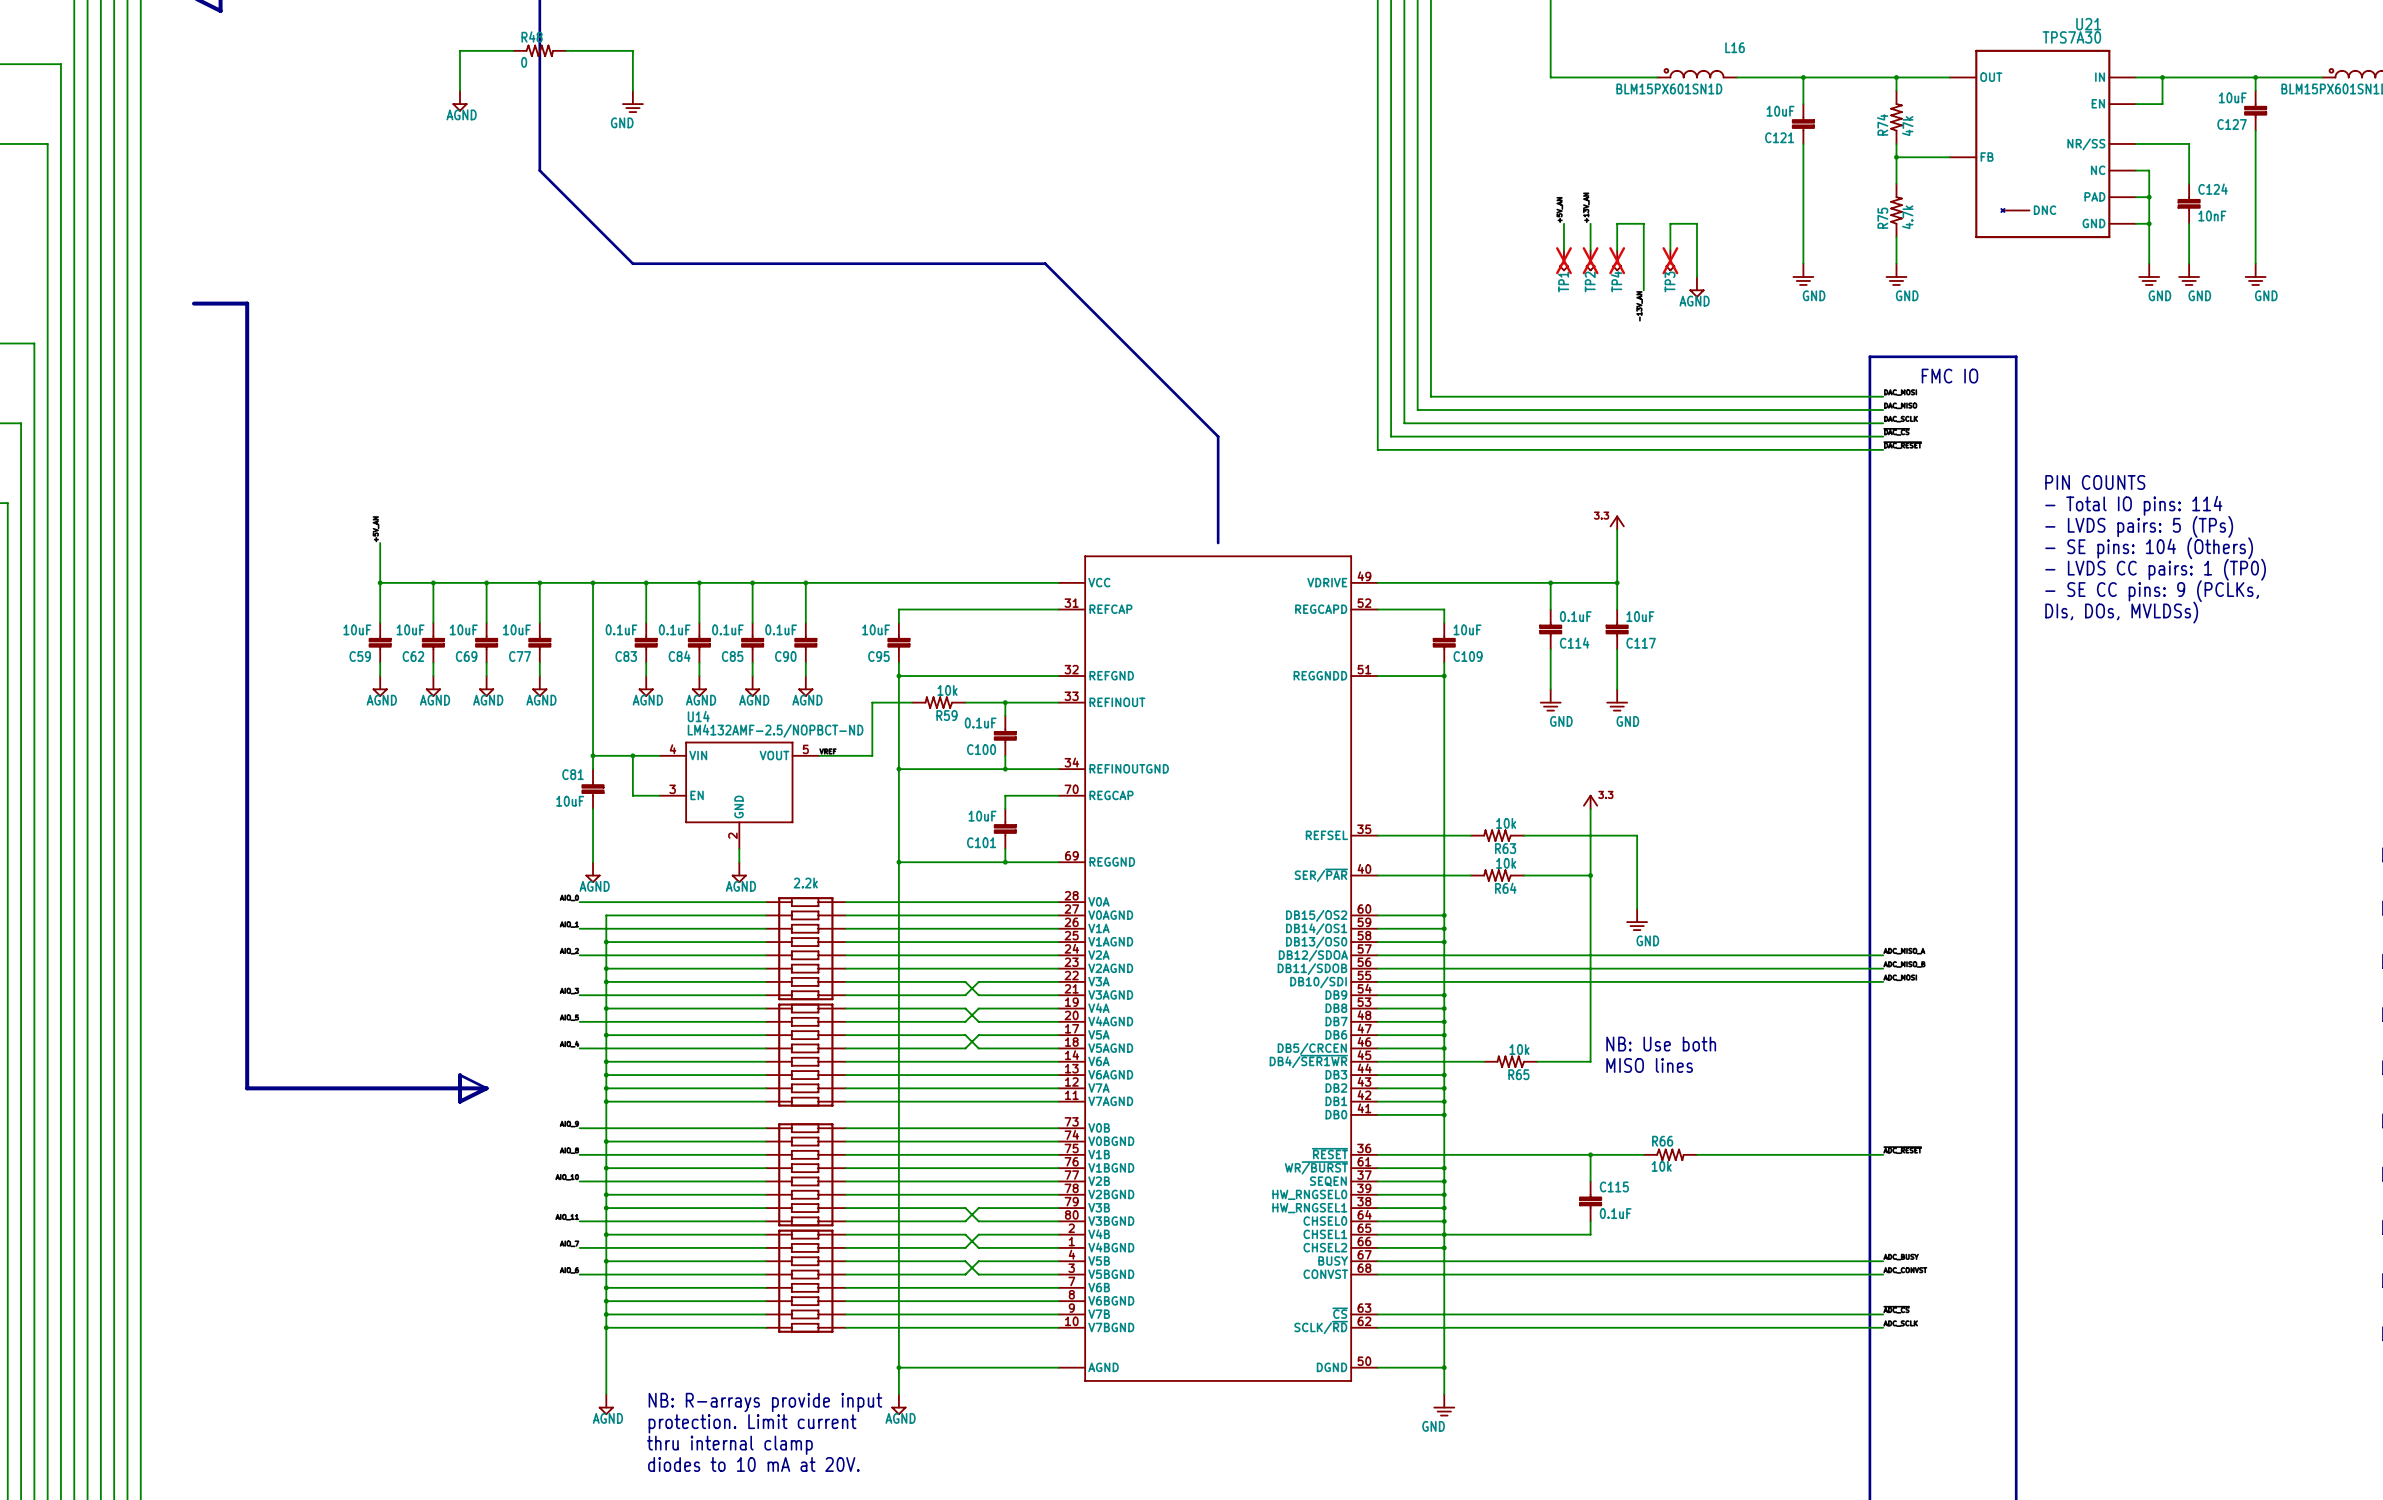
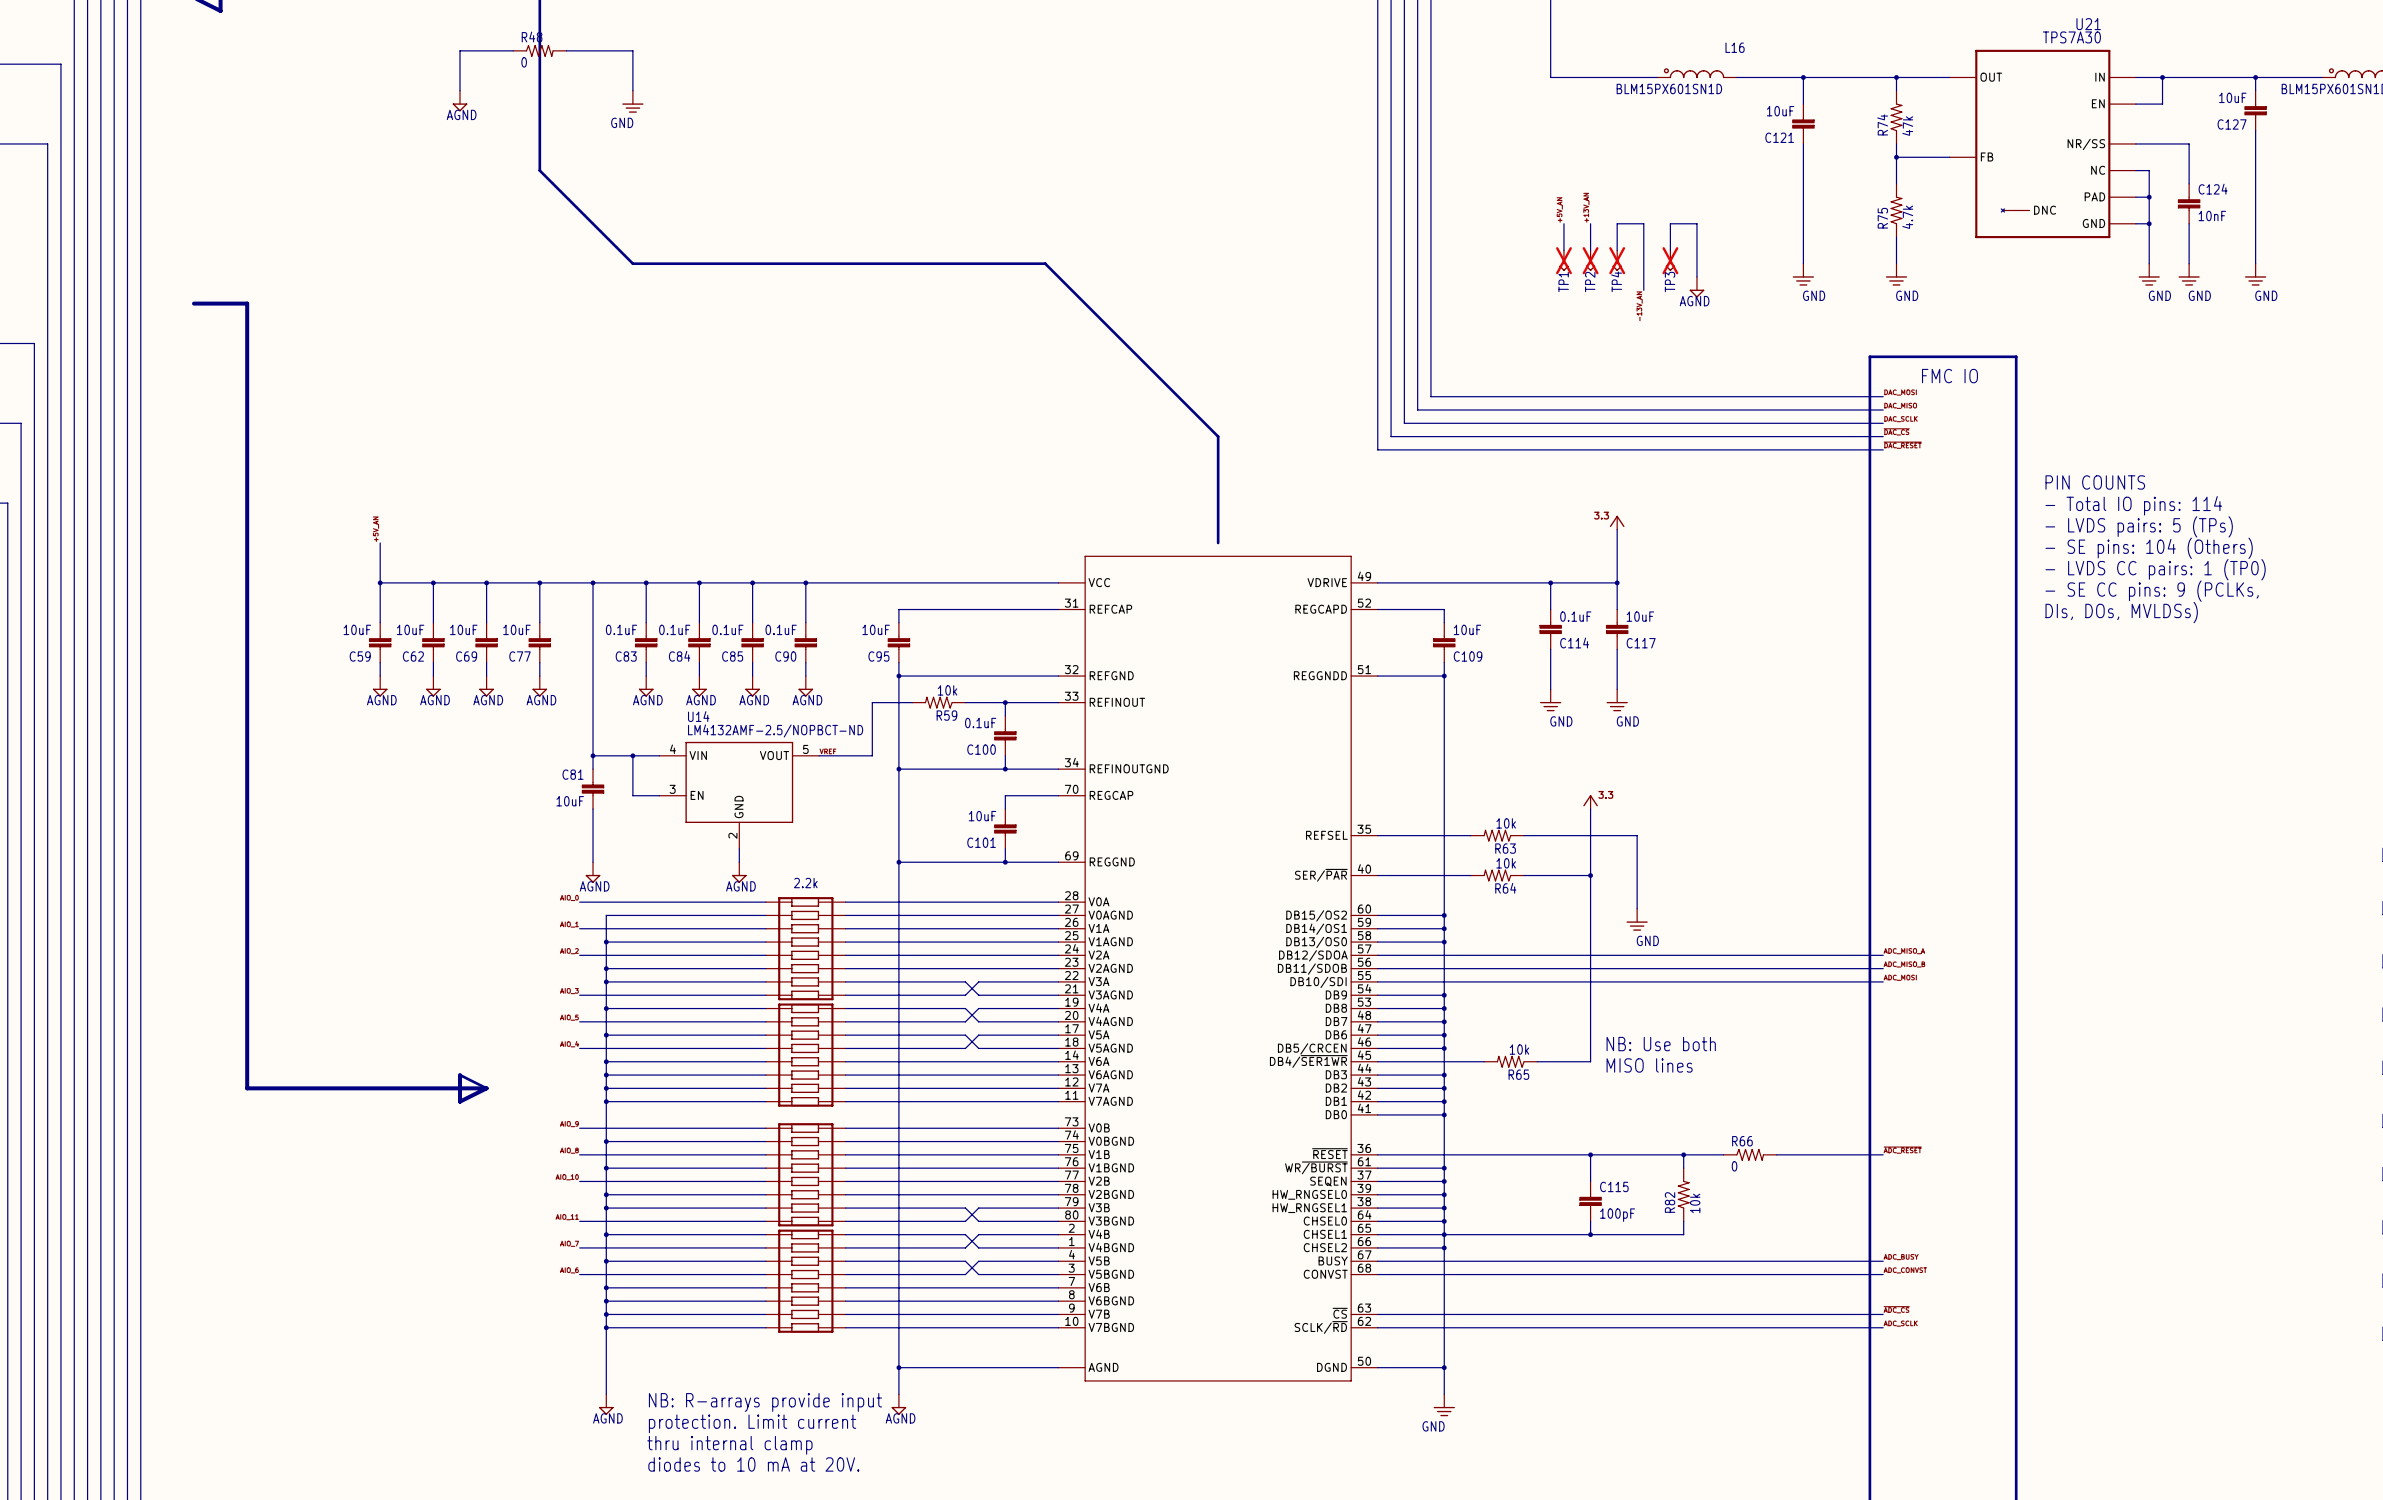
R66 position: (1670, 1154) -> (1750, 1154)
wire: none -> (1683, 1154) (1683, 1168)
junction: none -> (1683, 1154)
R66 value: 10k (1661, 1166) -> 0 (1734, 1166)
R82: none -> 10k (1683, 1194)
C115 value: 0.1uF (1615, 1213) -> 100pF (1617, 1215)
wire: none -> (1683, 1221) (1683, 1234) (1590, 1234)
junction: none -> (1590, 1234)

